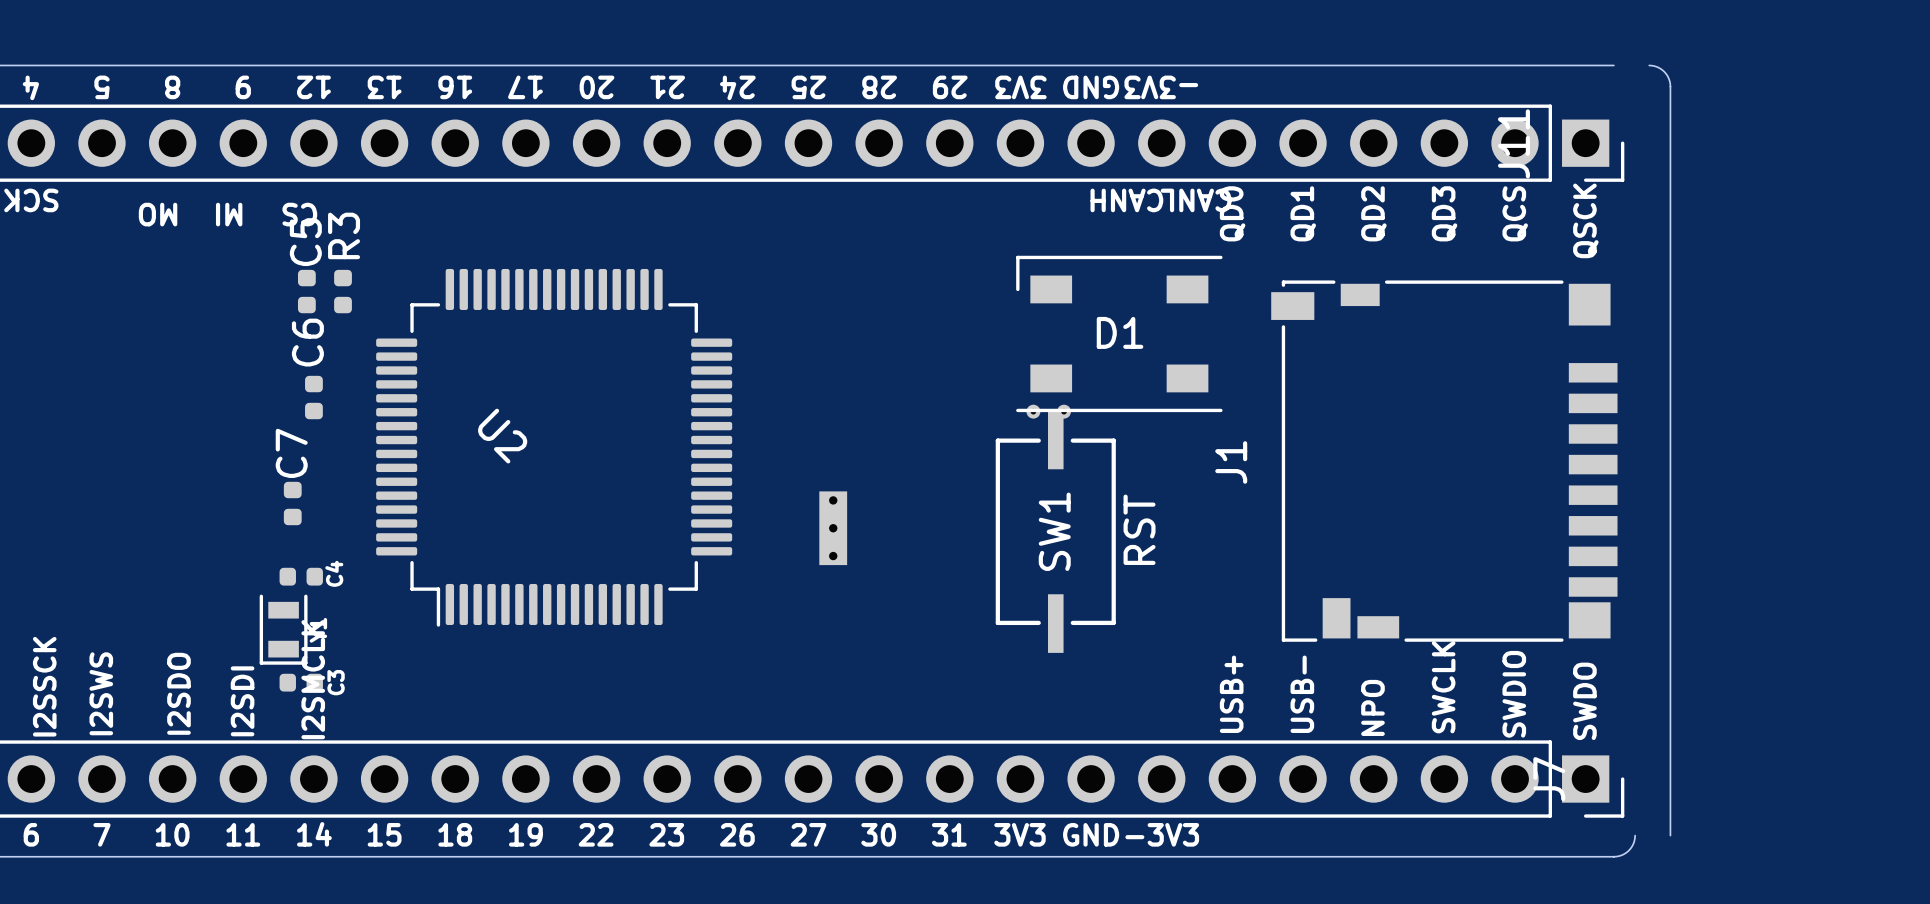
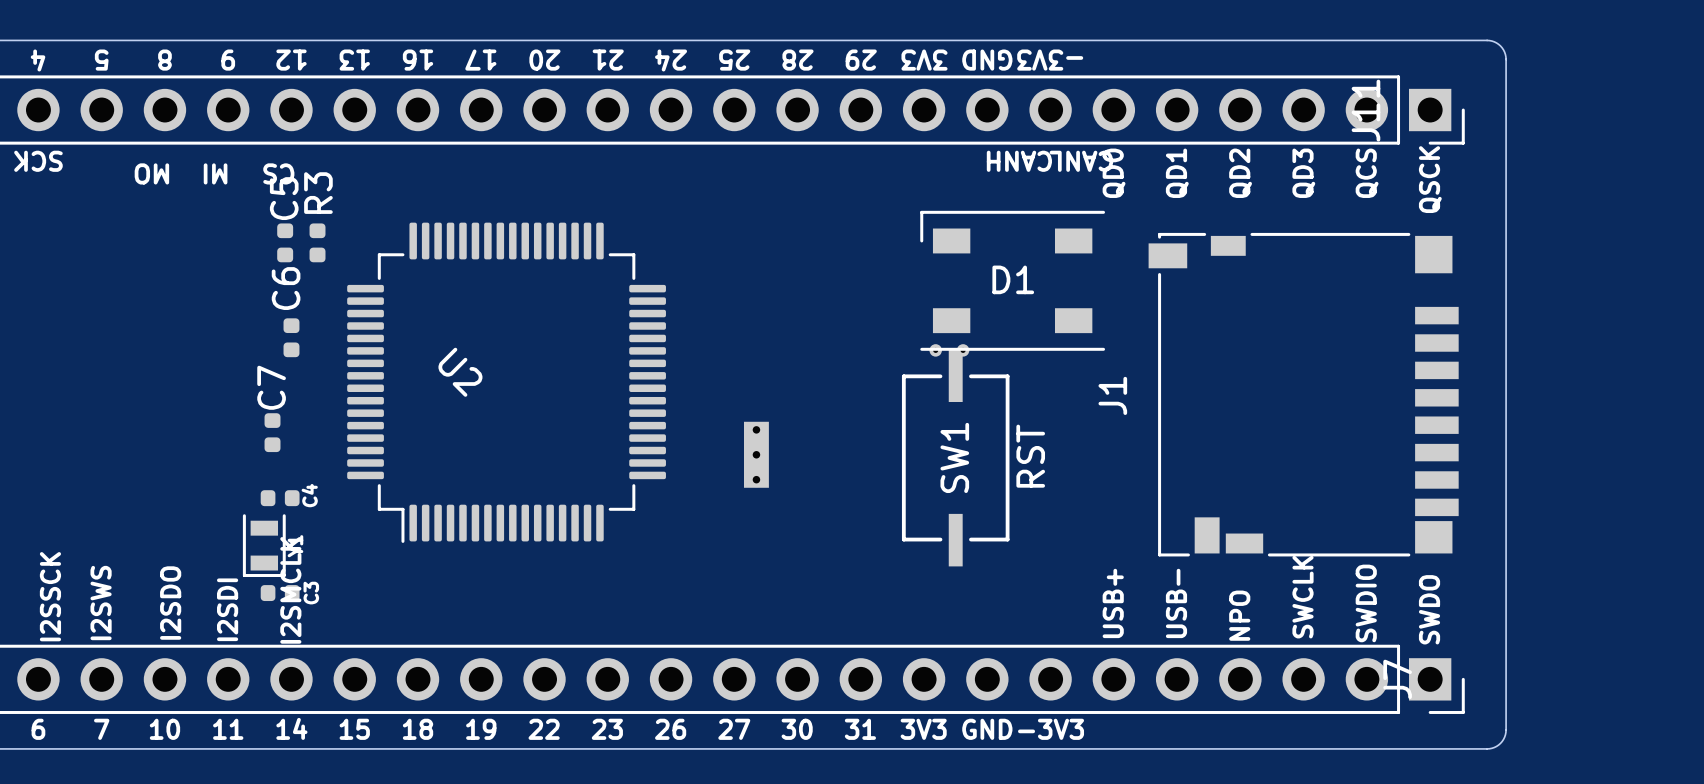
board edge: none -> (1455, 40) (1487, 40)
board edge: (1635, 835) (1633, 843) (1628, 850) (1622, 855) (1613, 856) -> (1506, 729) (1502, 741) (1494, 747) (1455, 748)

